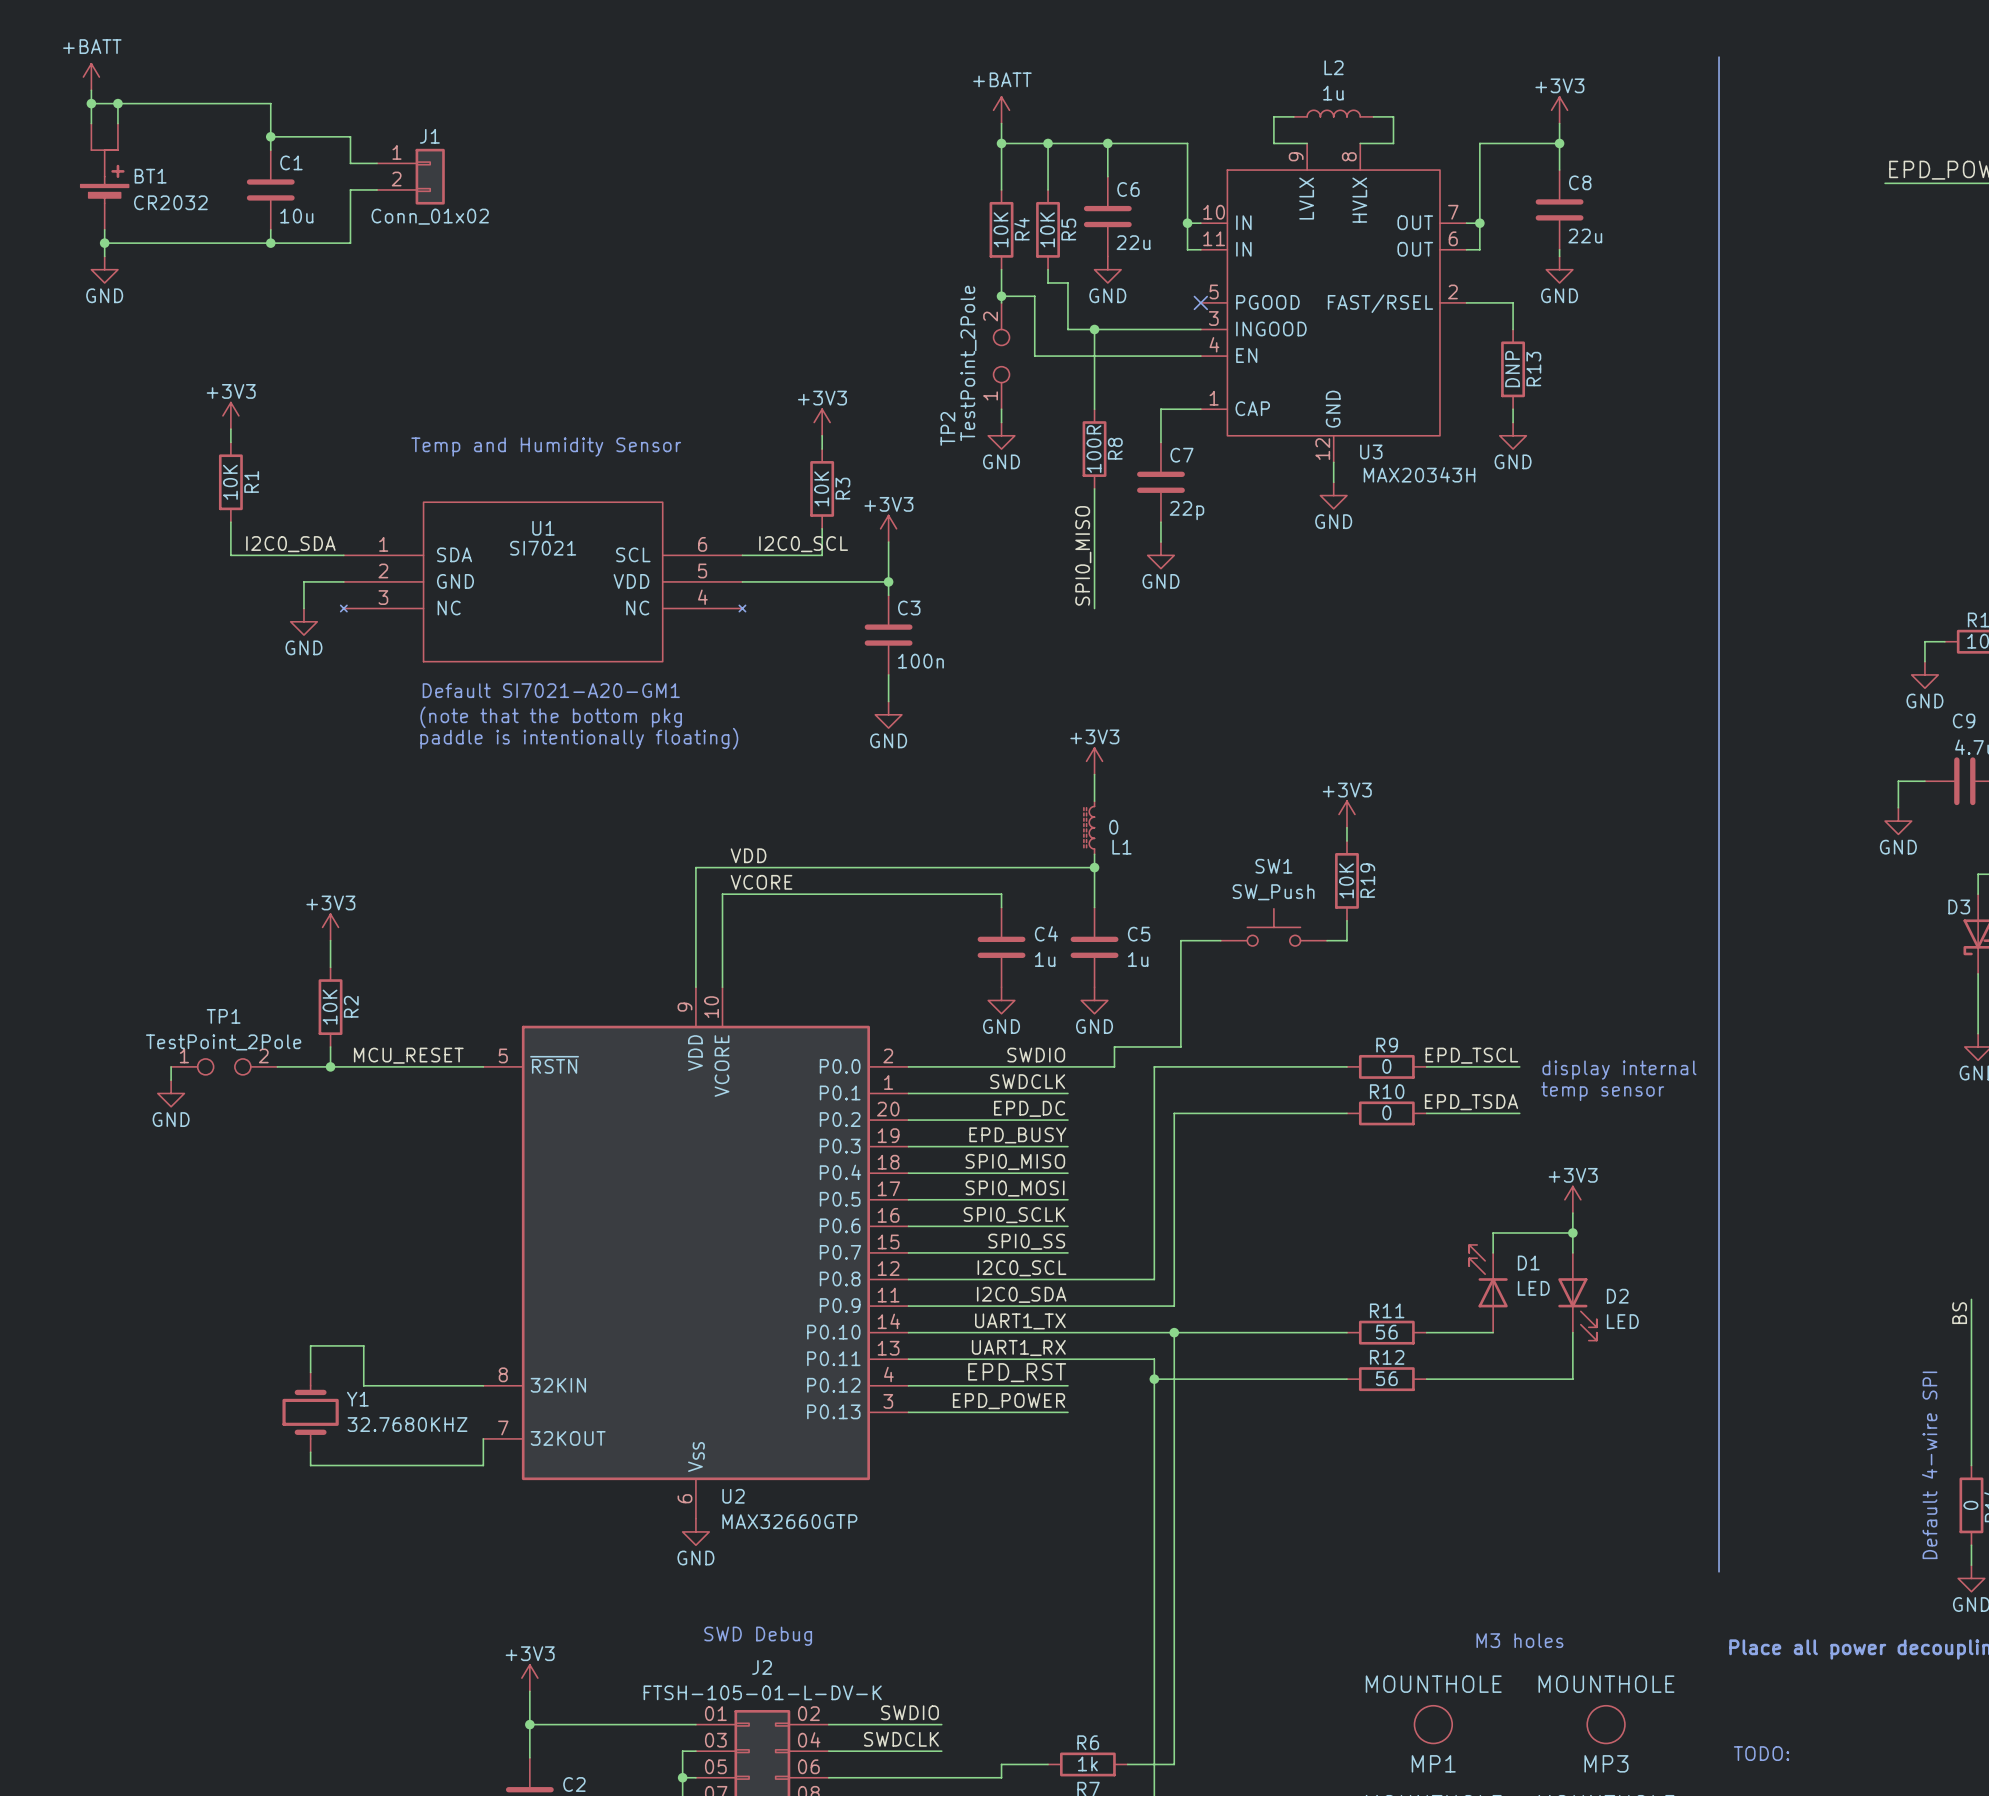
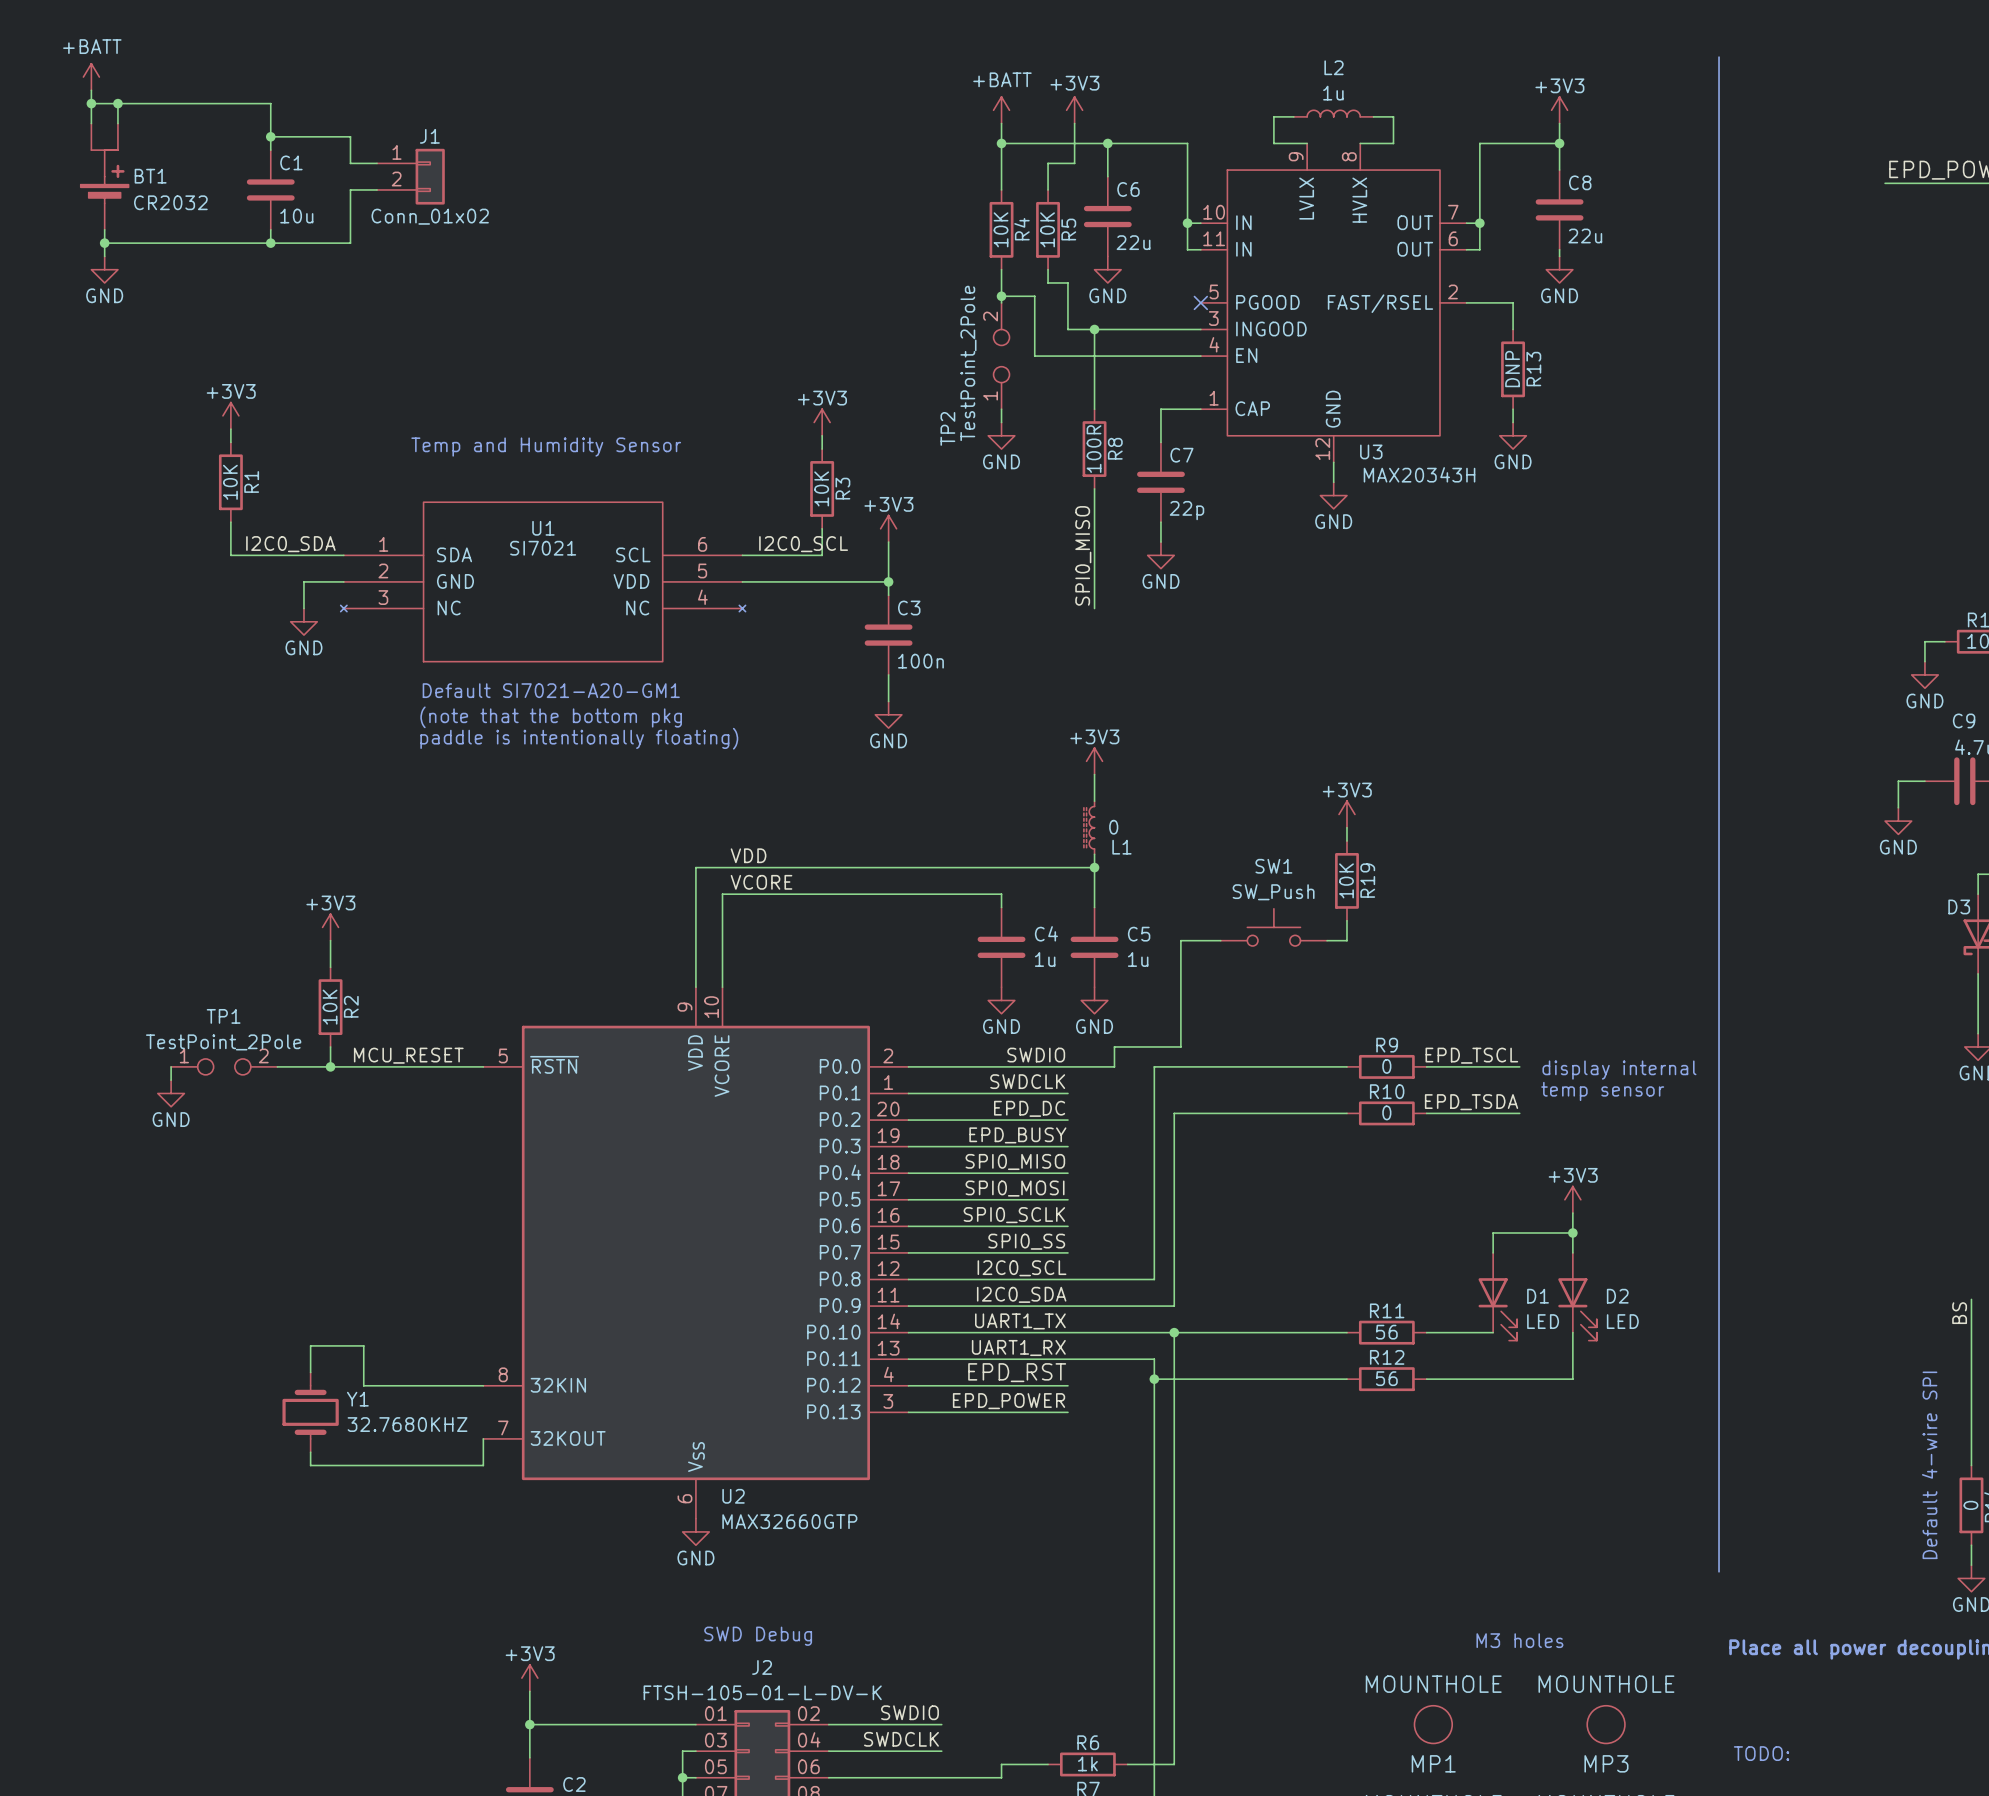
power symbol: none -> +3V3 (1074, 110)
wire: (1048, 143) (1048, 163) -> (1074, 123) (1074, 163) (1048, 163)
junction: (1048, 143) -> none
D1 name position: D1 (1528, 1263) -> D1 (1538, 1296)
D1 rotation: 0° (1488, 1276) -> 180° (1497, 1309)
D1 value position: LED (1533, 1288) -> LED (1543, 1321)

